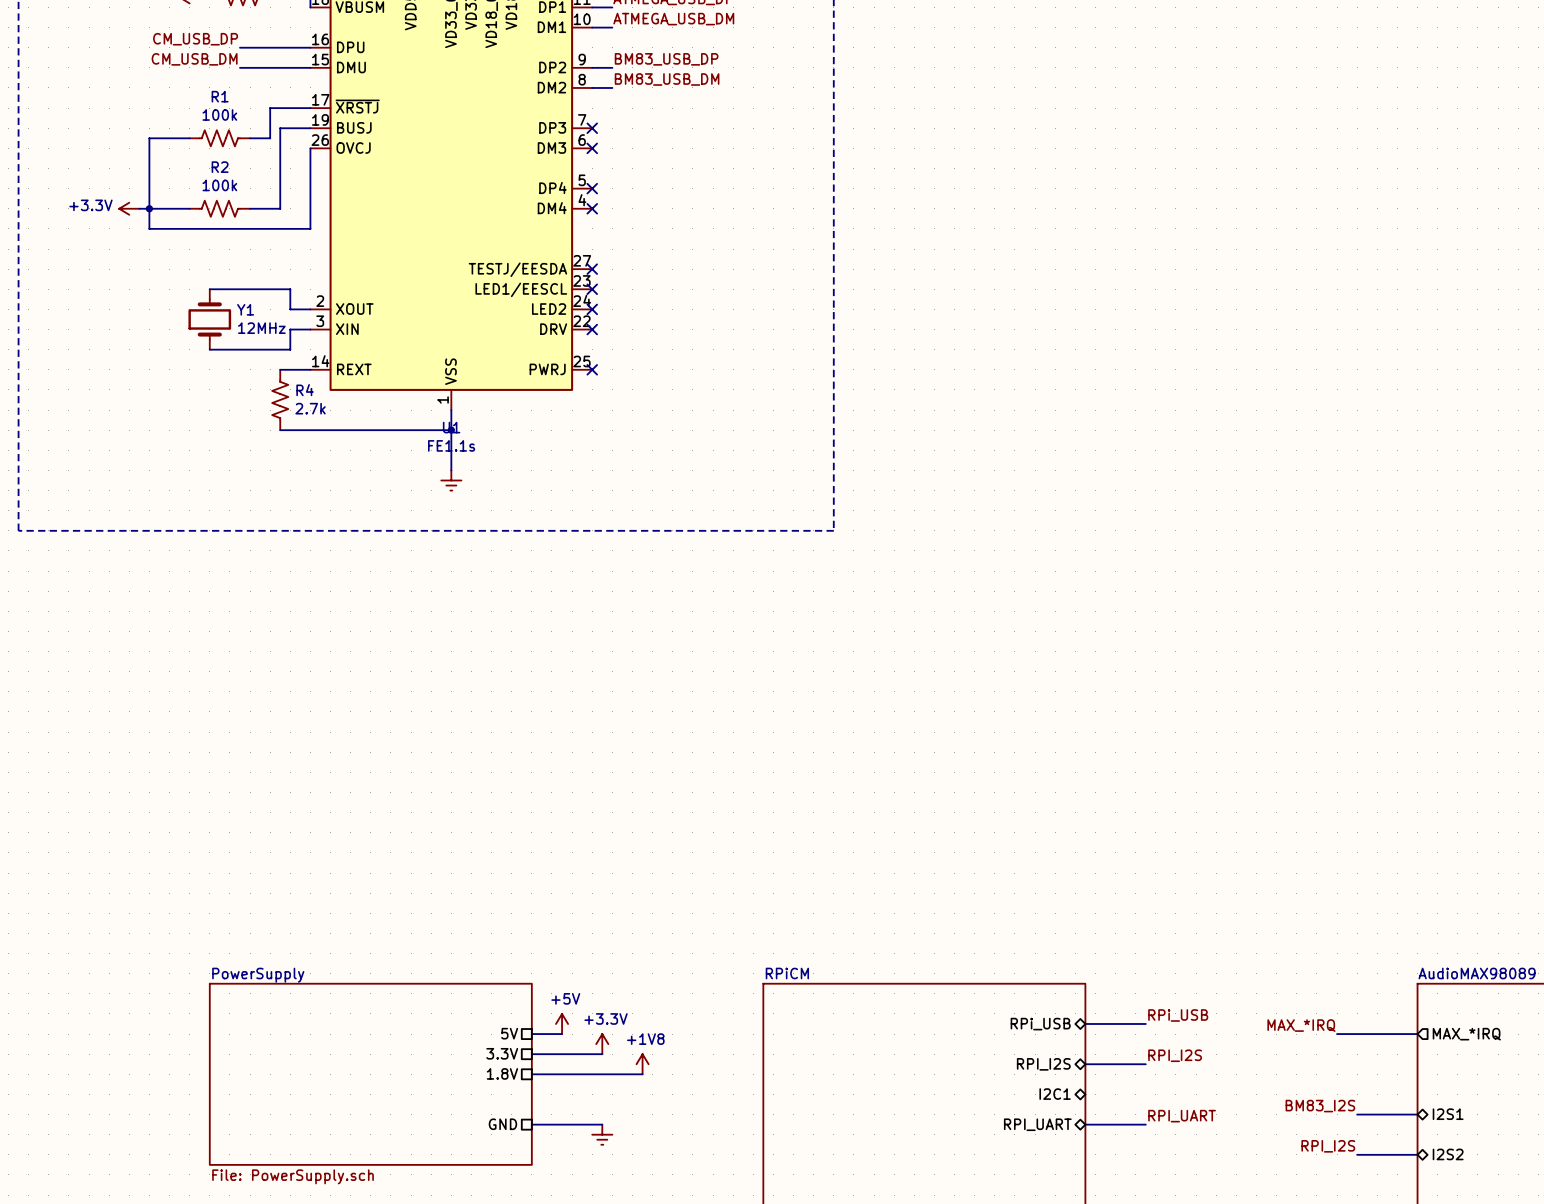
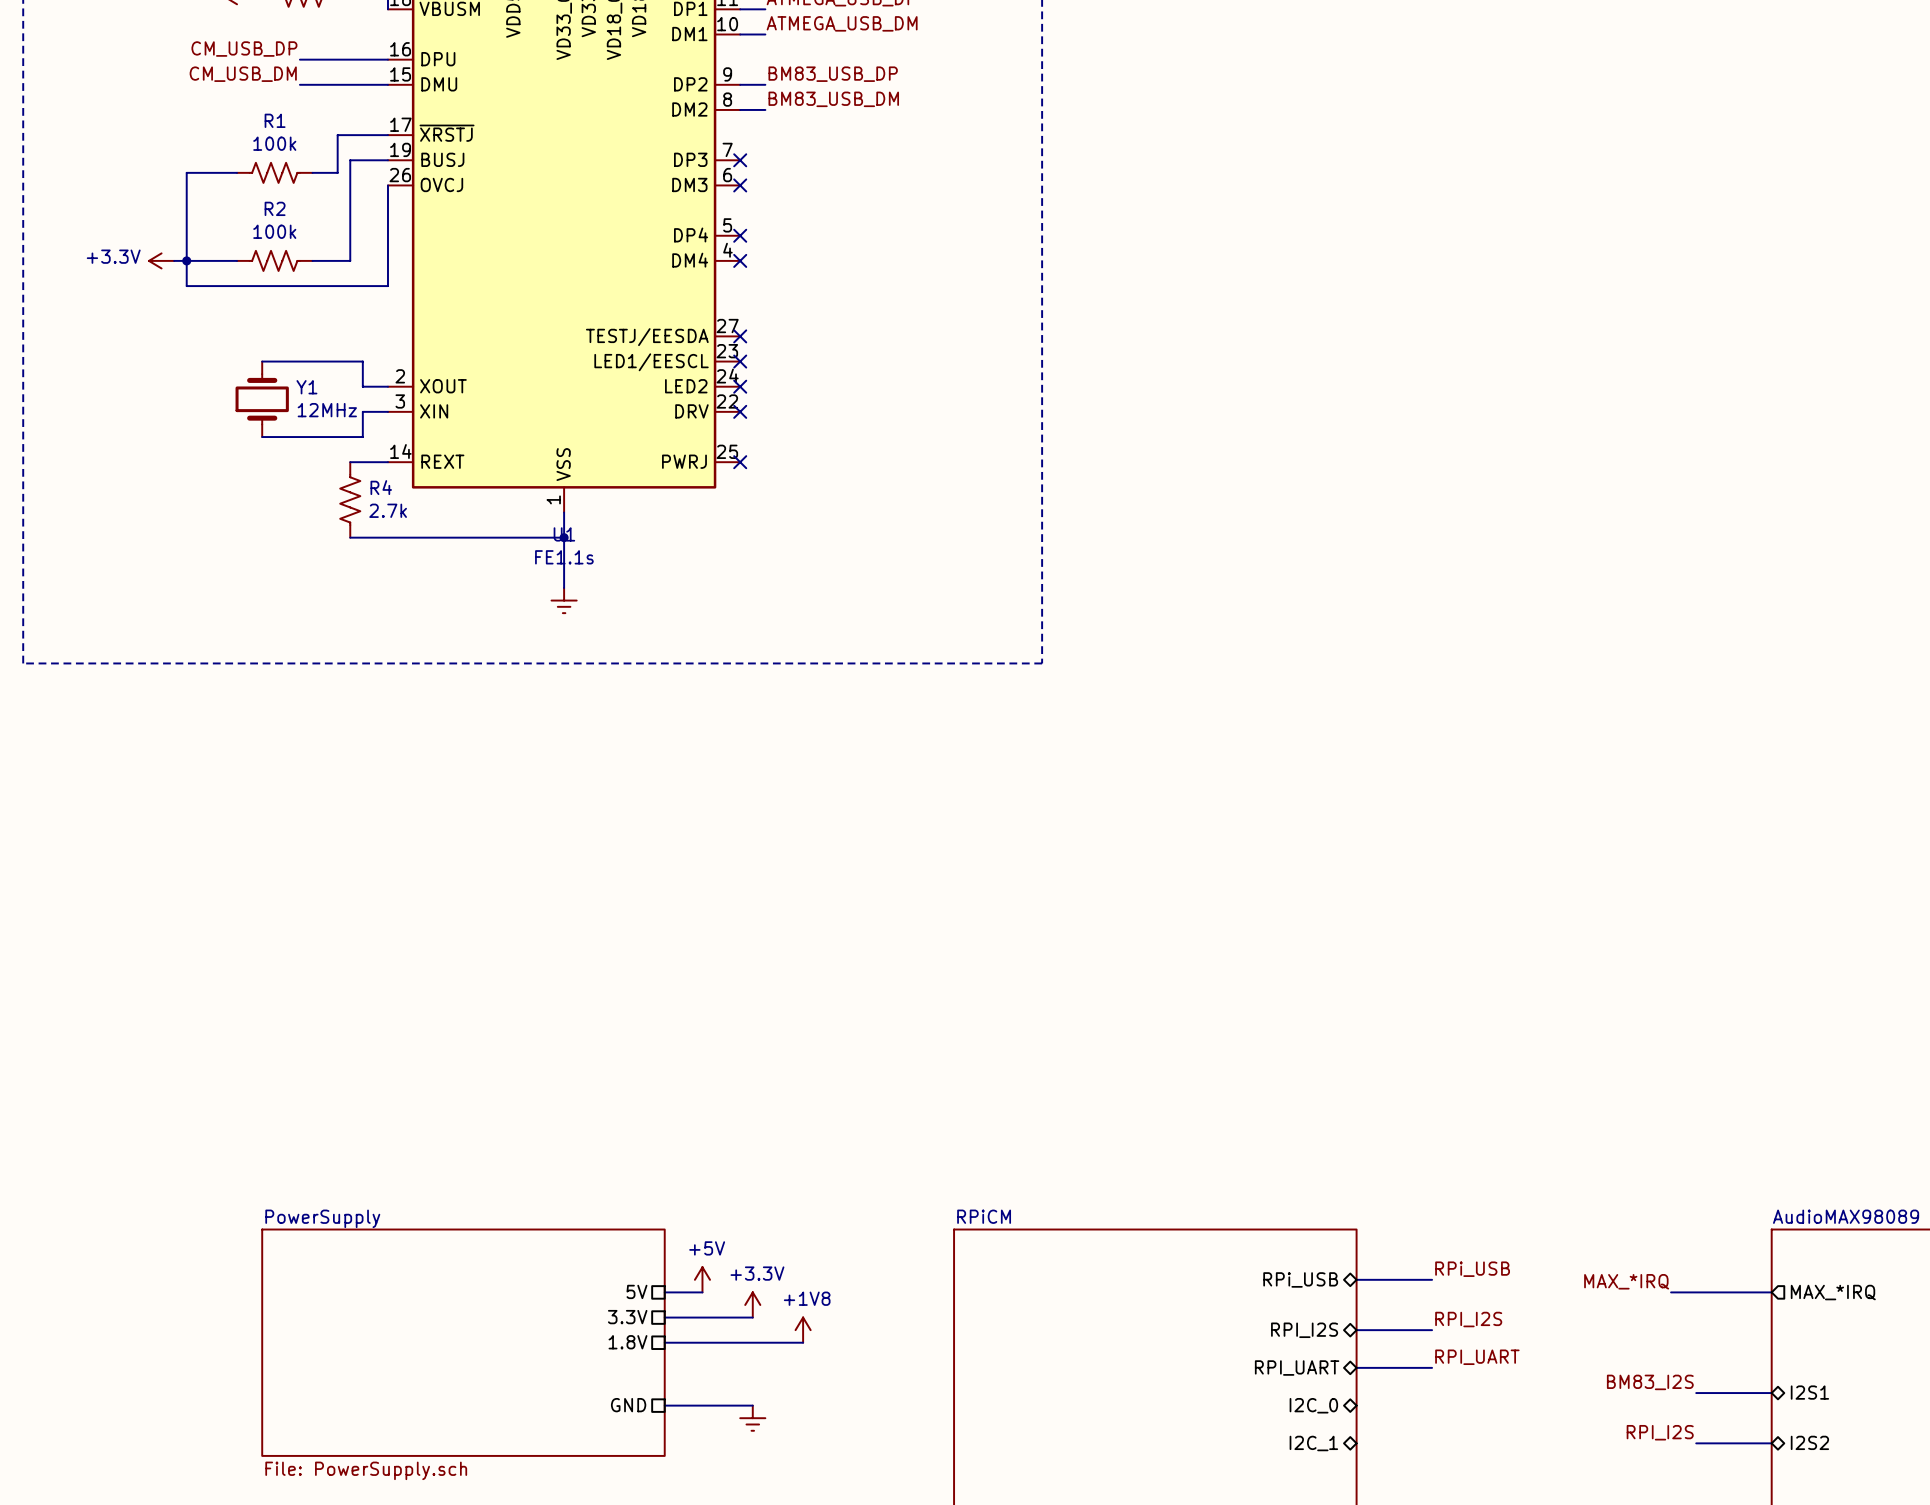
sheet pin: I2C1 (1055, 1094) -> RPI_UART (1297, 1368)
label position: RPI_UART (1182, 1116) -> RPI_UART (1477, 1357)
sheet pin: RPI_UART (1037, 1124) -> I2C_0 (1313, 1405)
bus: (1085, 1124) (1145, 1124) -> (1356, 1367) (1432, 1367)
sheet pin: none -> I2C_1 (1313, 1443)

